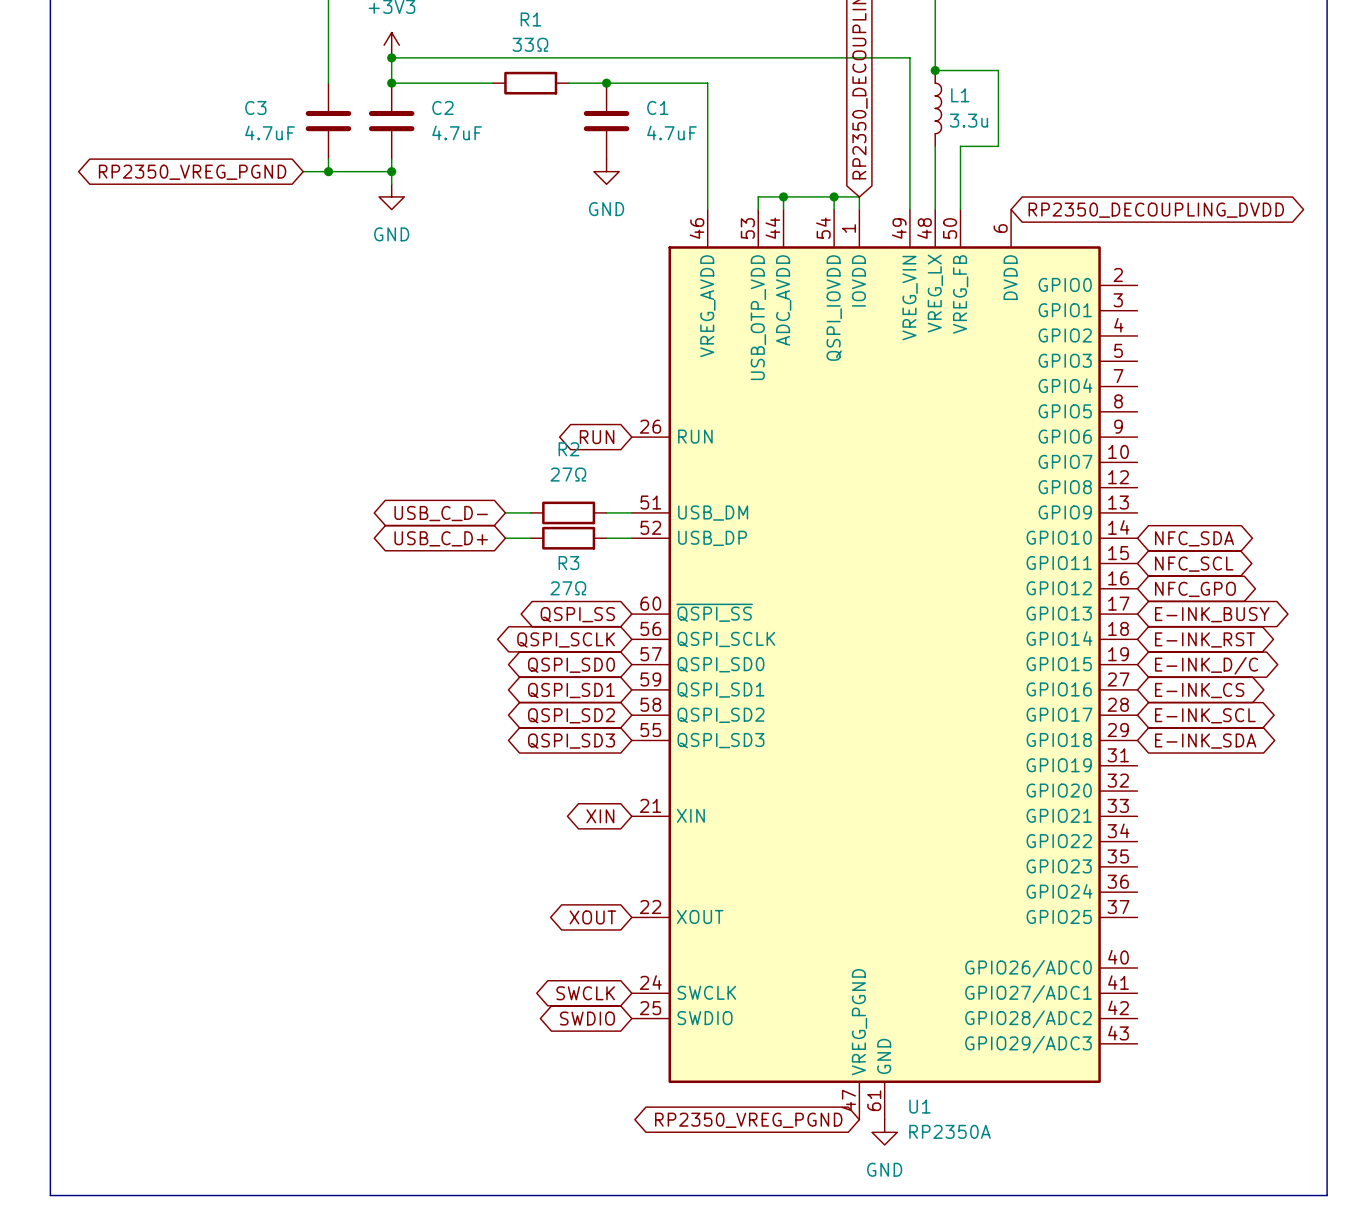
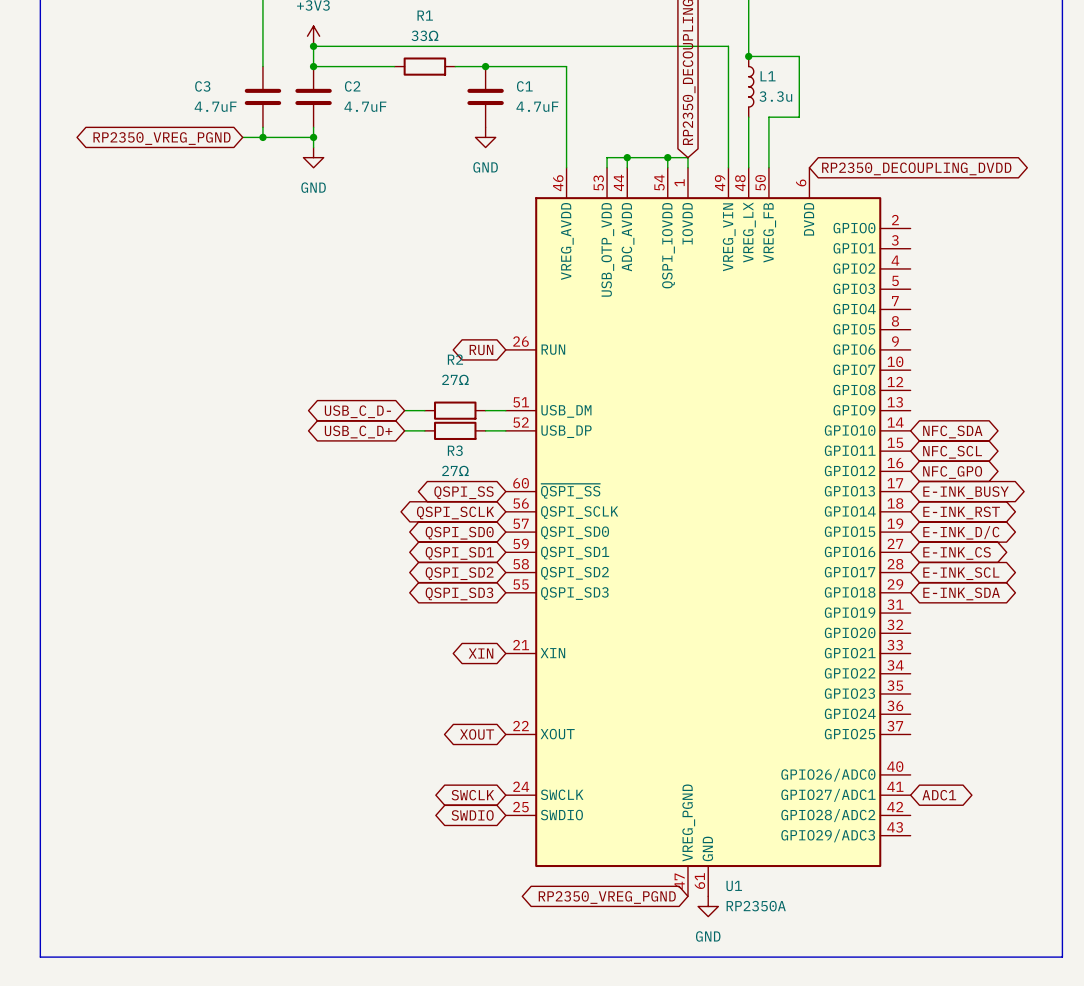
global label: none -> ADC1 (939, 795)

